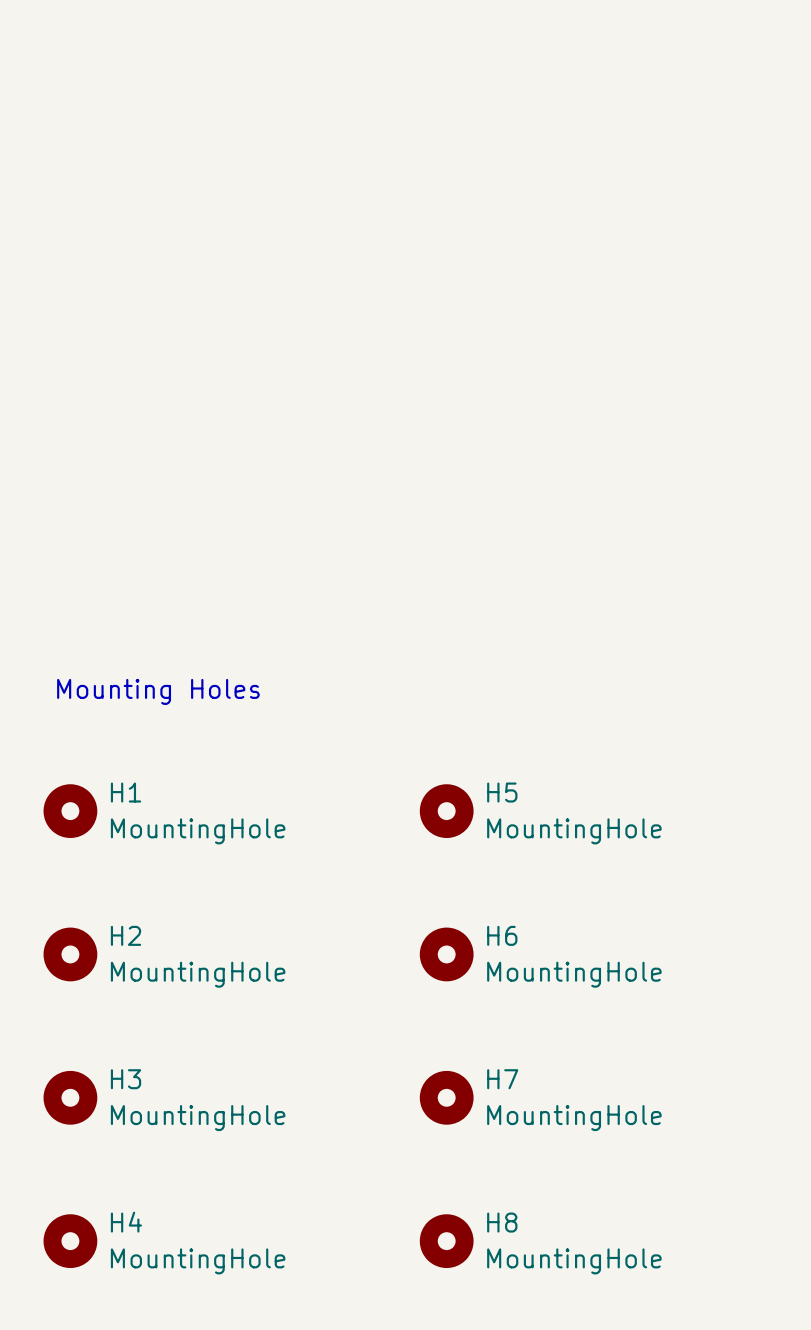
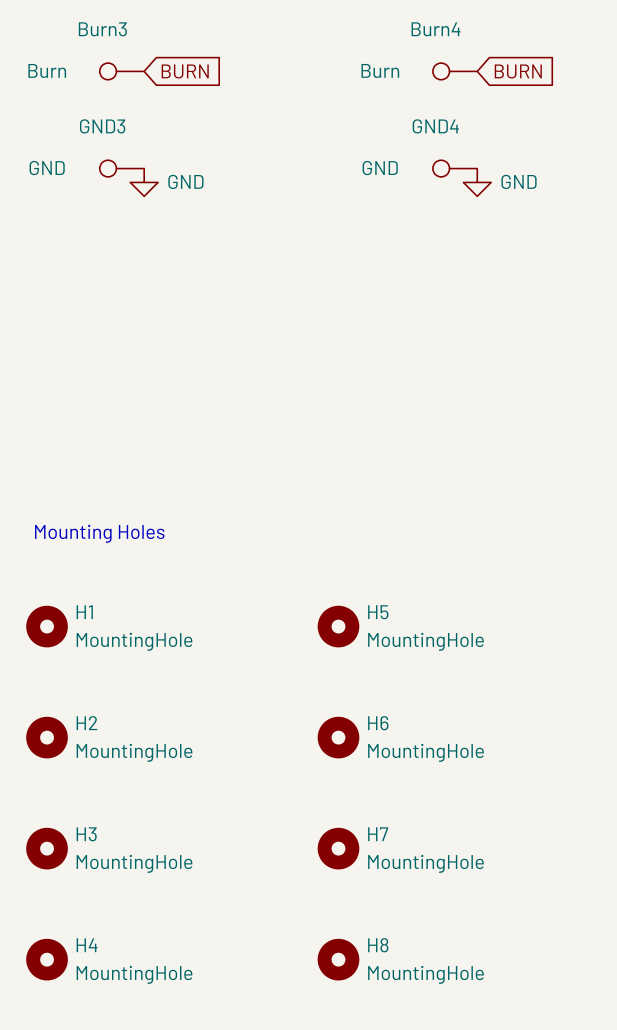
Burn3: none -> Burn (121, 71)
global label: none -> BURN (185, 71)
Burn4: none -> Burn (455, 71)
global label: none -> BURN (518, 71)
GND3: none -> GND (121, 168)
GND4: none -> GND (455, 168)
power symbol: none -> GND (144, 182)
power symbol: none -> GND (477, 182)

